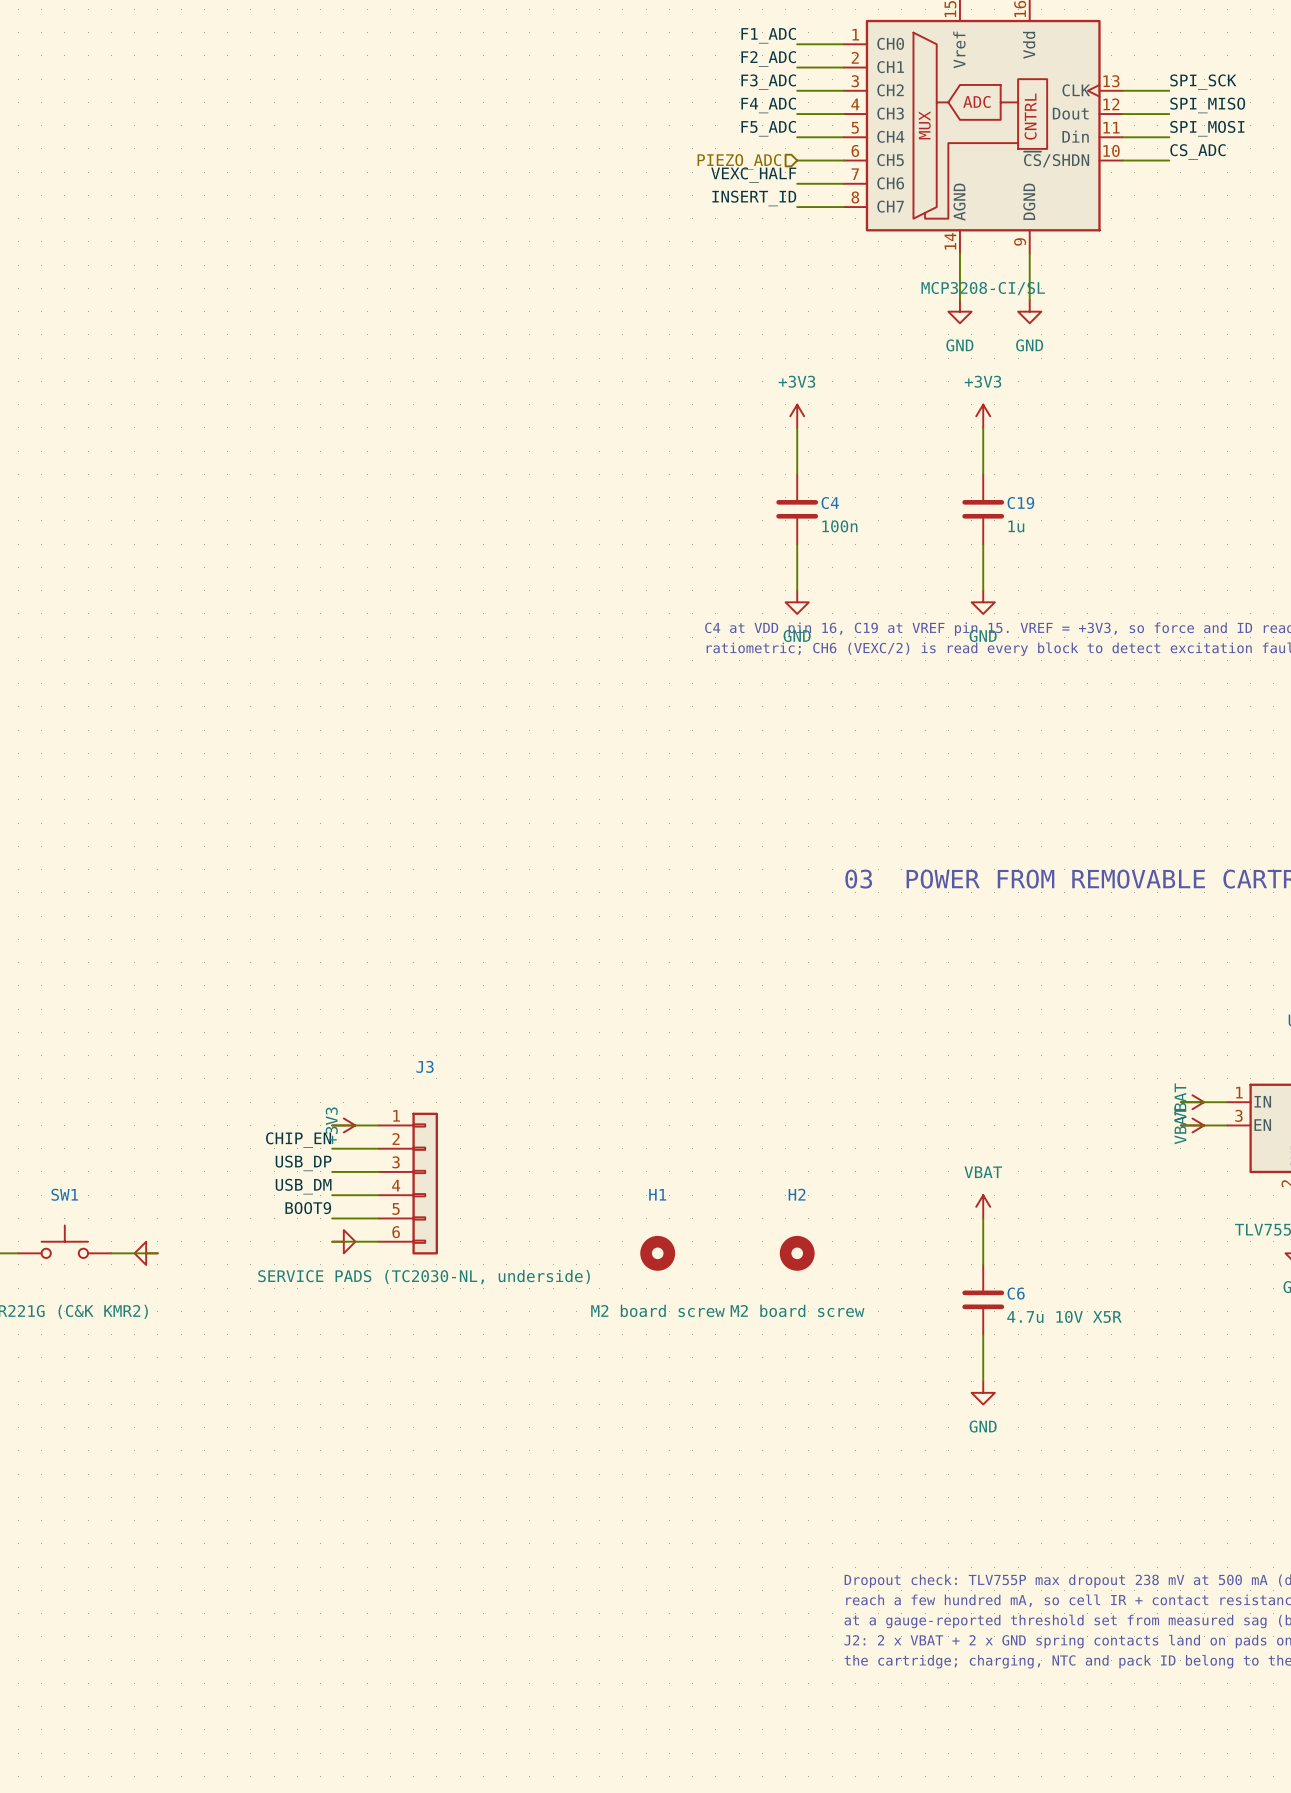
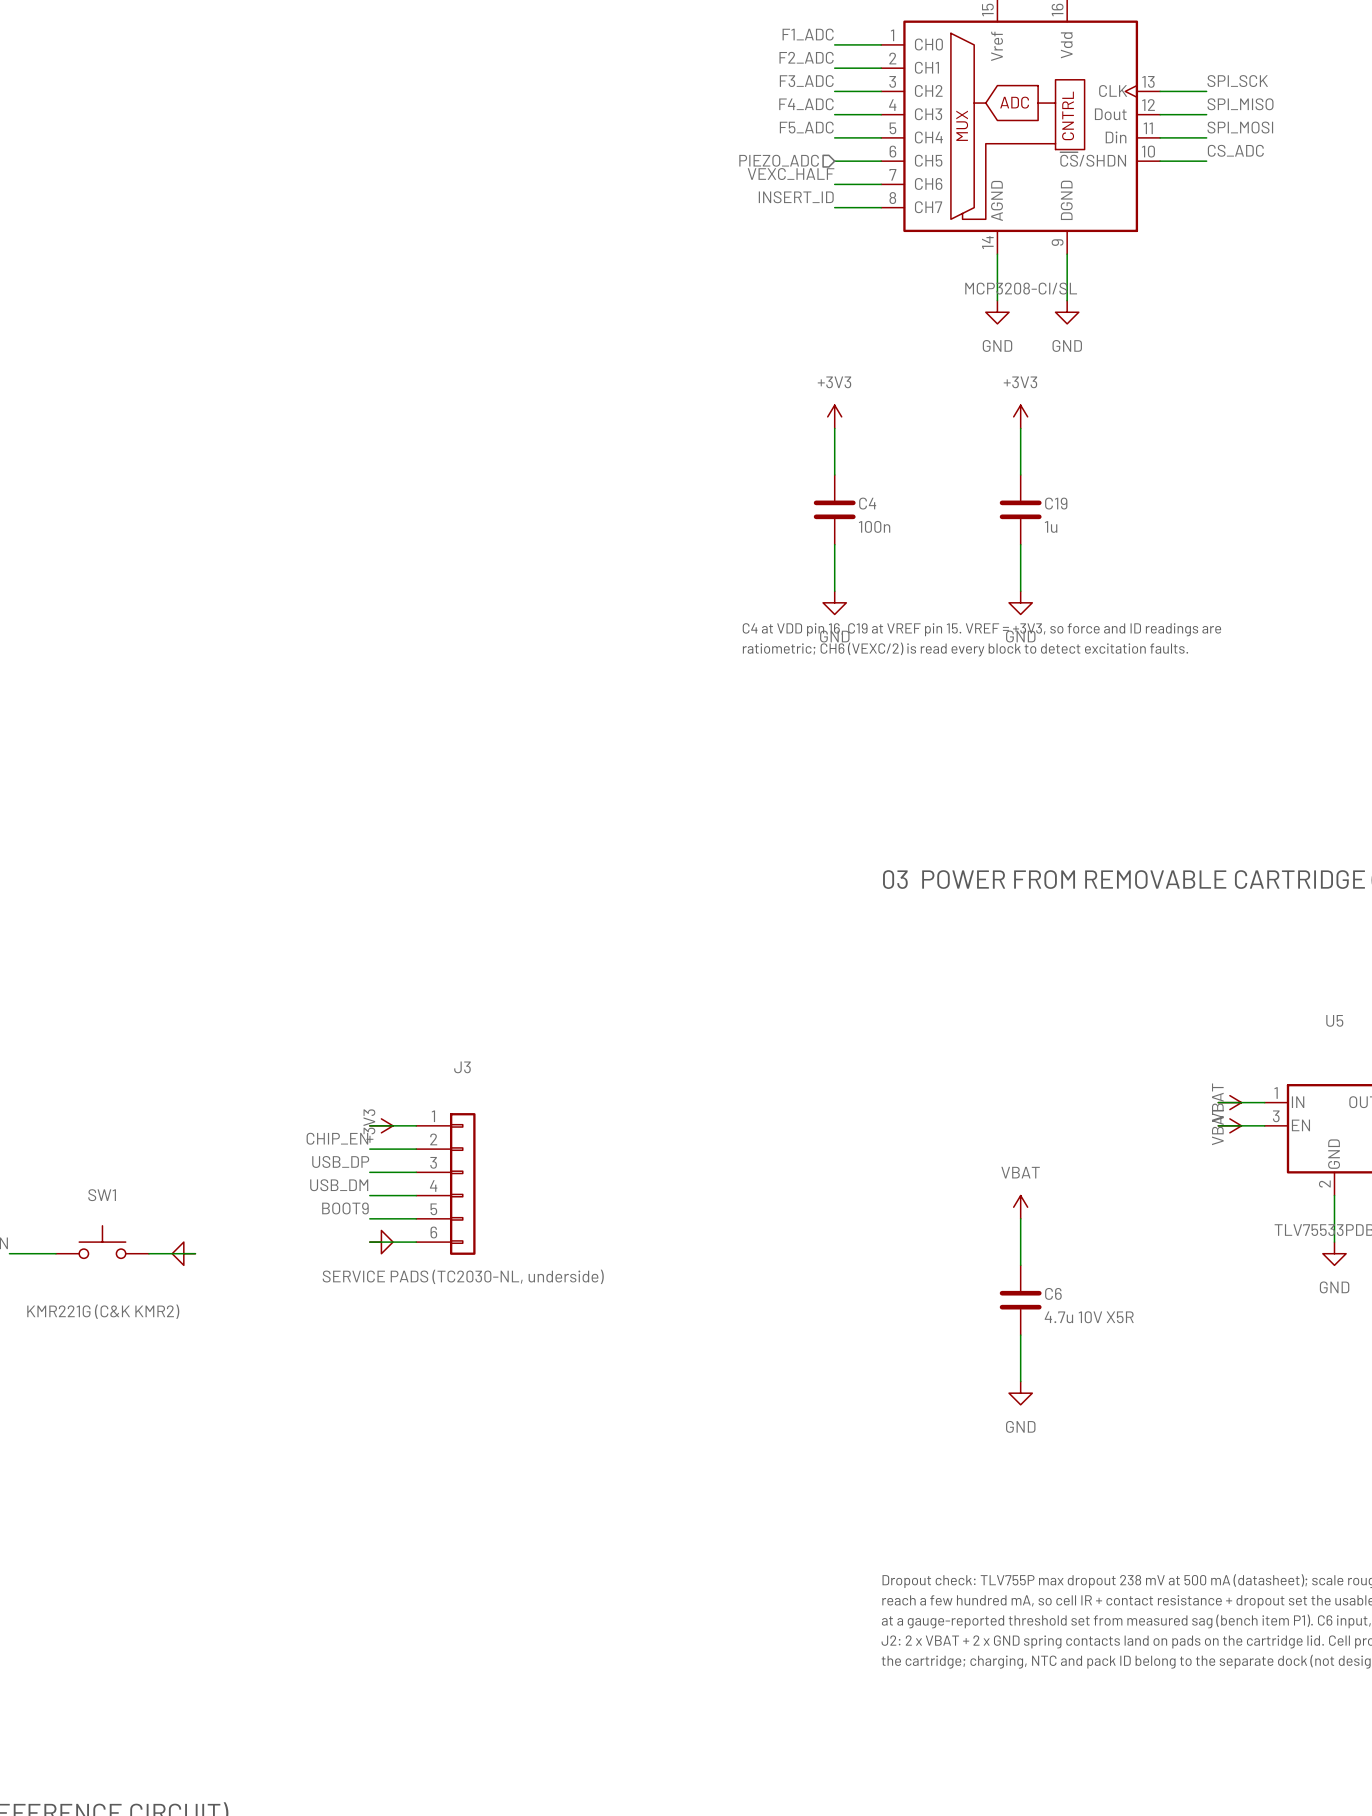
H1: M2 board screw (657, 1253) -> none
H2: M2 board screw (797, 1253) -> none

